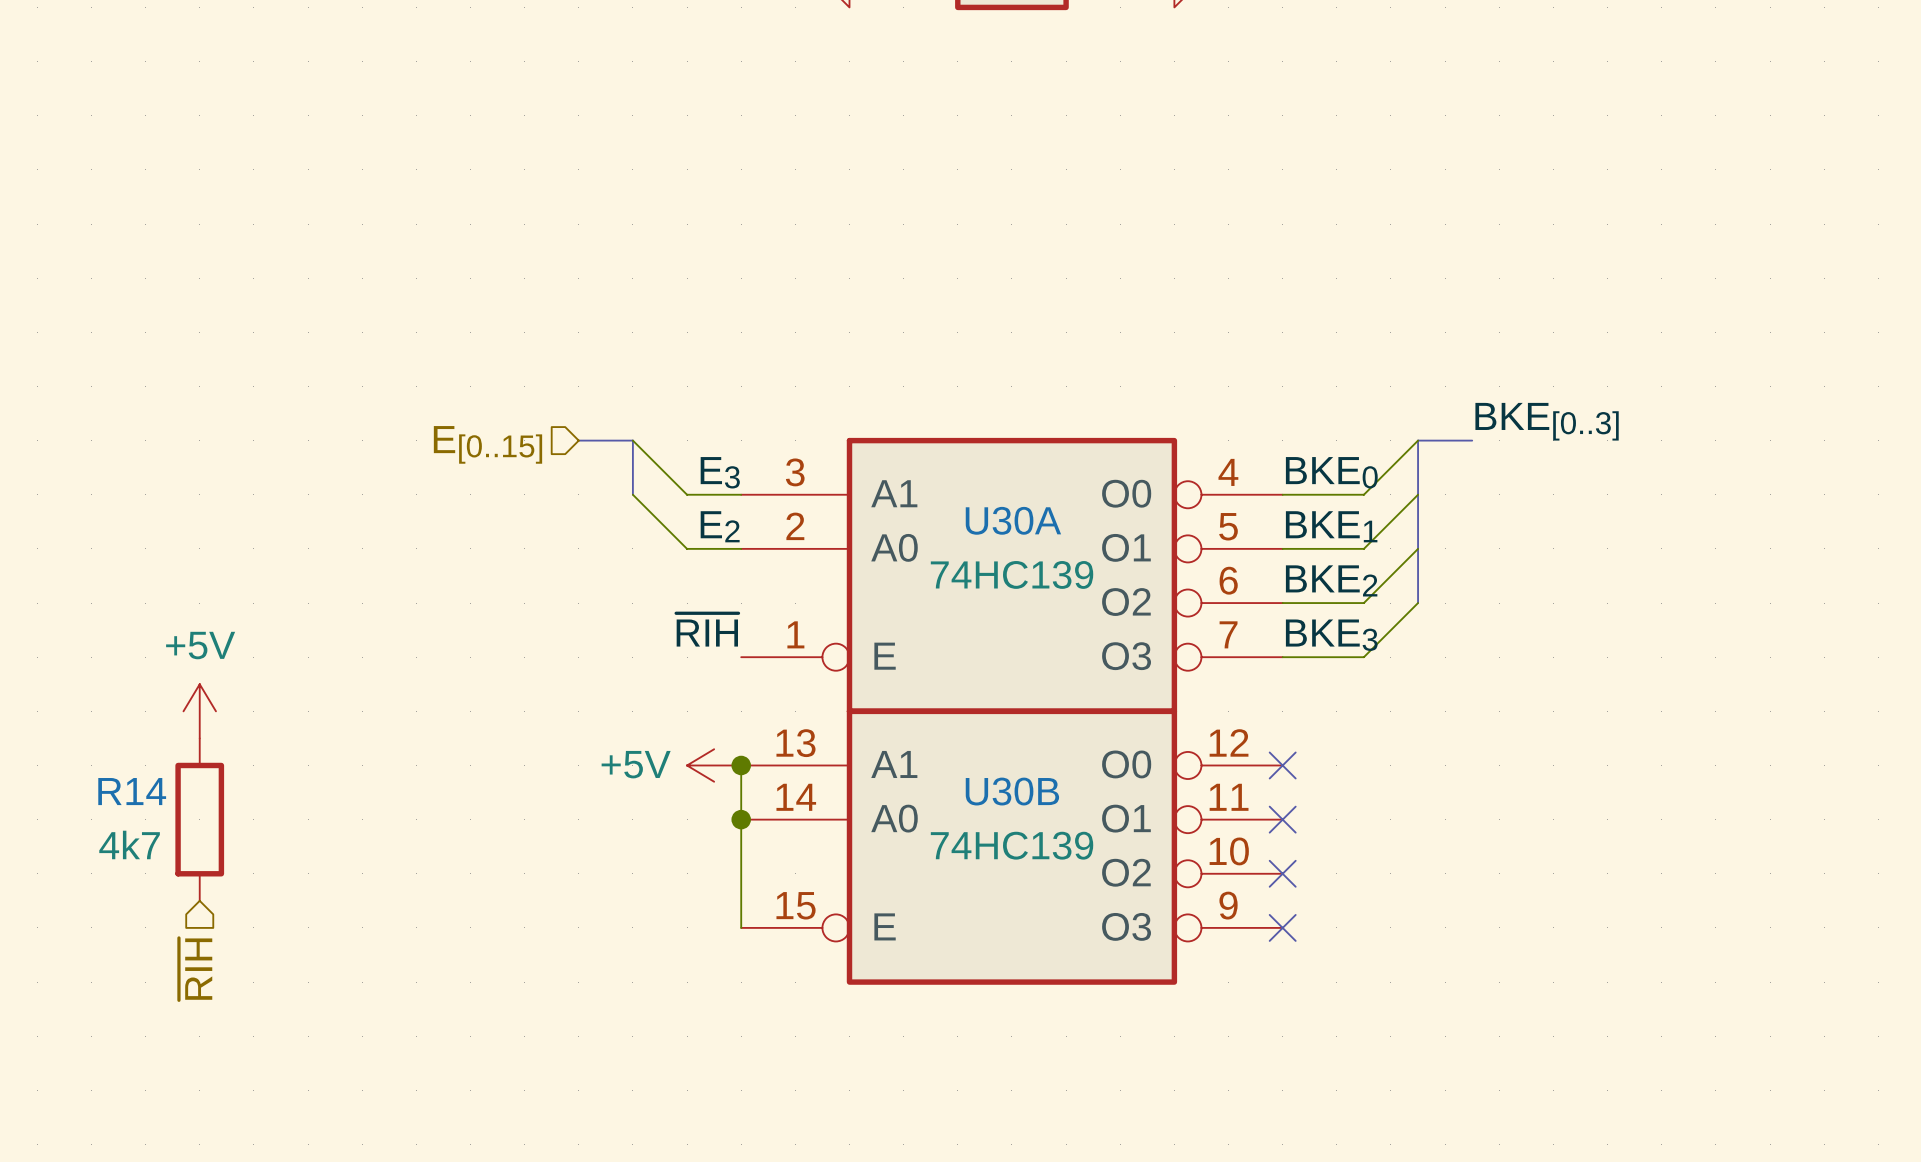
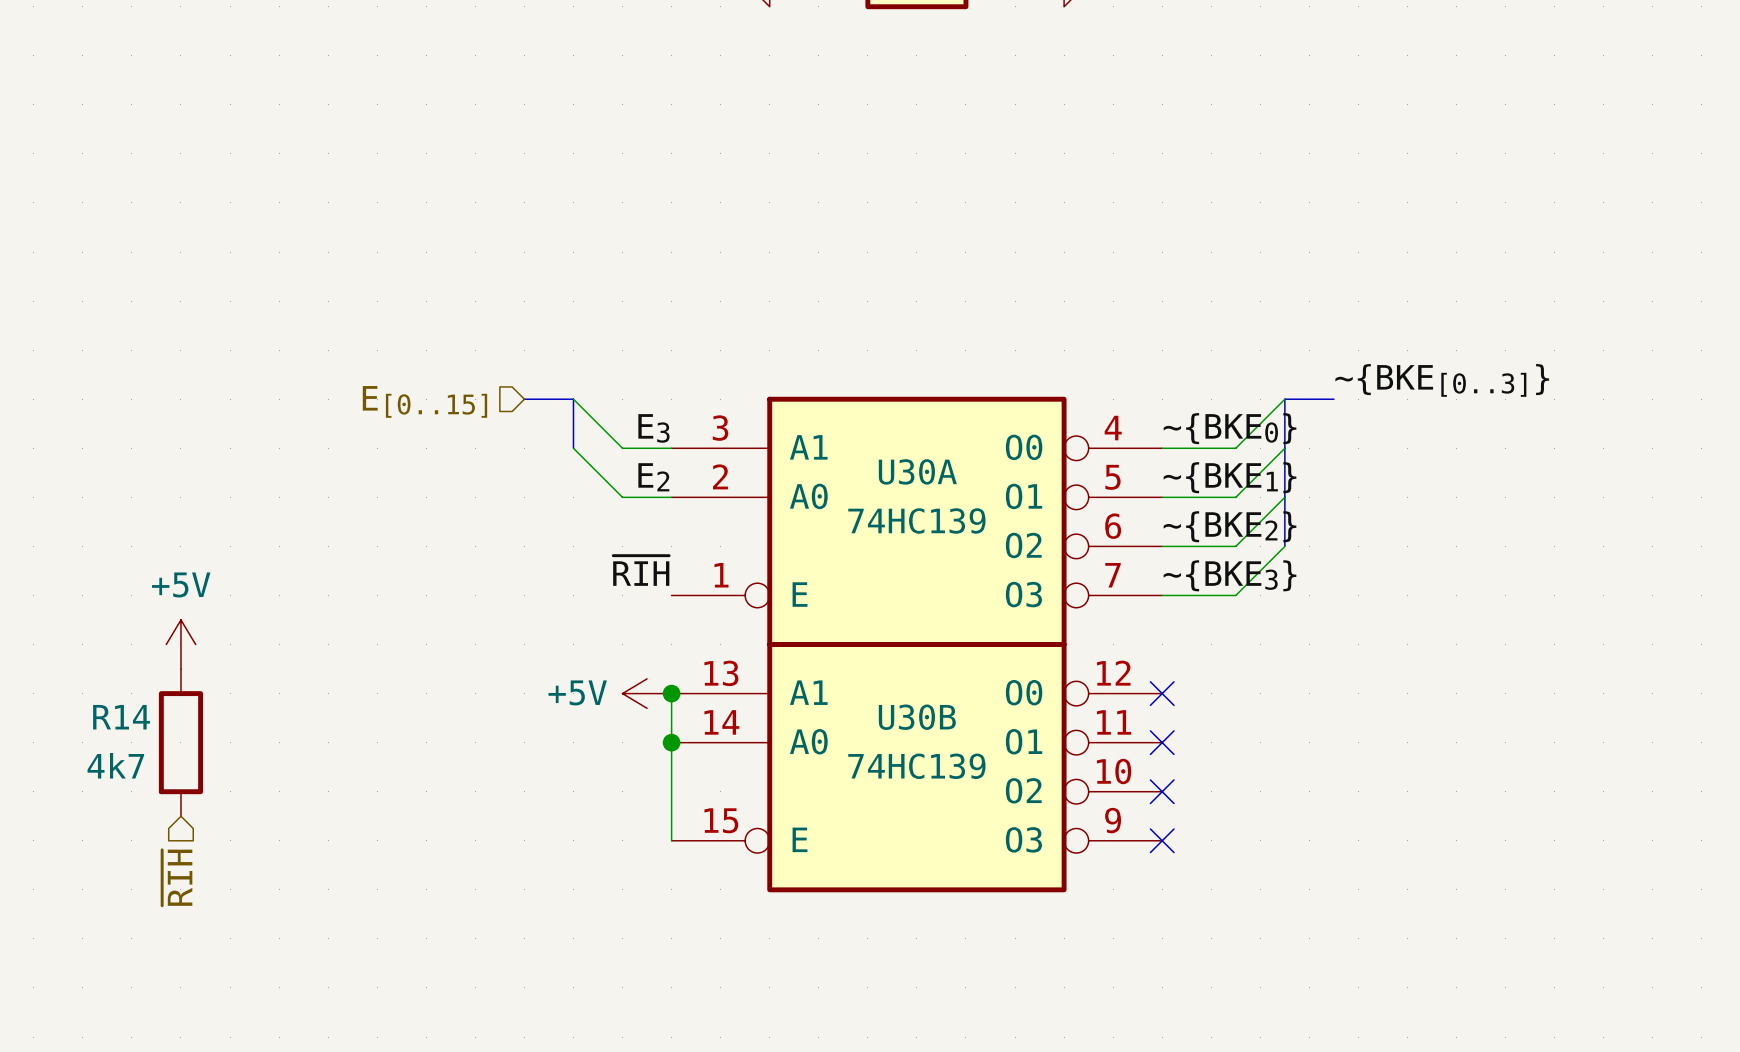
label: BKE[0..3] (1547, 421) -> ~{BKE[0..3]} (1442, 380)
label: BKE0 (1331, 472) -> ~{BKE0} (1230, 428)
label: BKE1 (1331, 526) -> ~{BKE1} (1230, 477)
label: BKE2 (1331, 580) -> ~{BKE2} (1230, 526)
label: BKE3 (1331, 635) -> ~{BKE3} (1230, 575)

